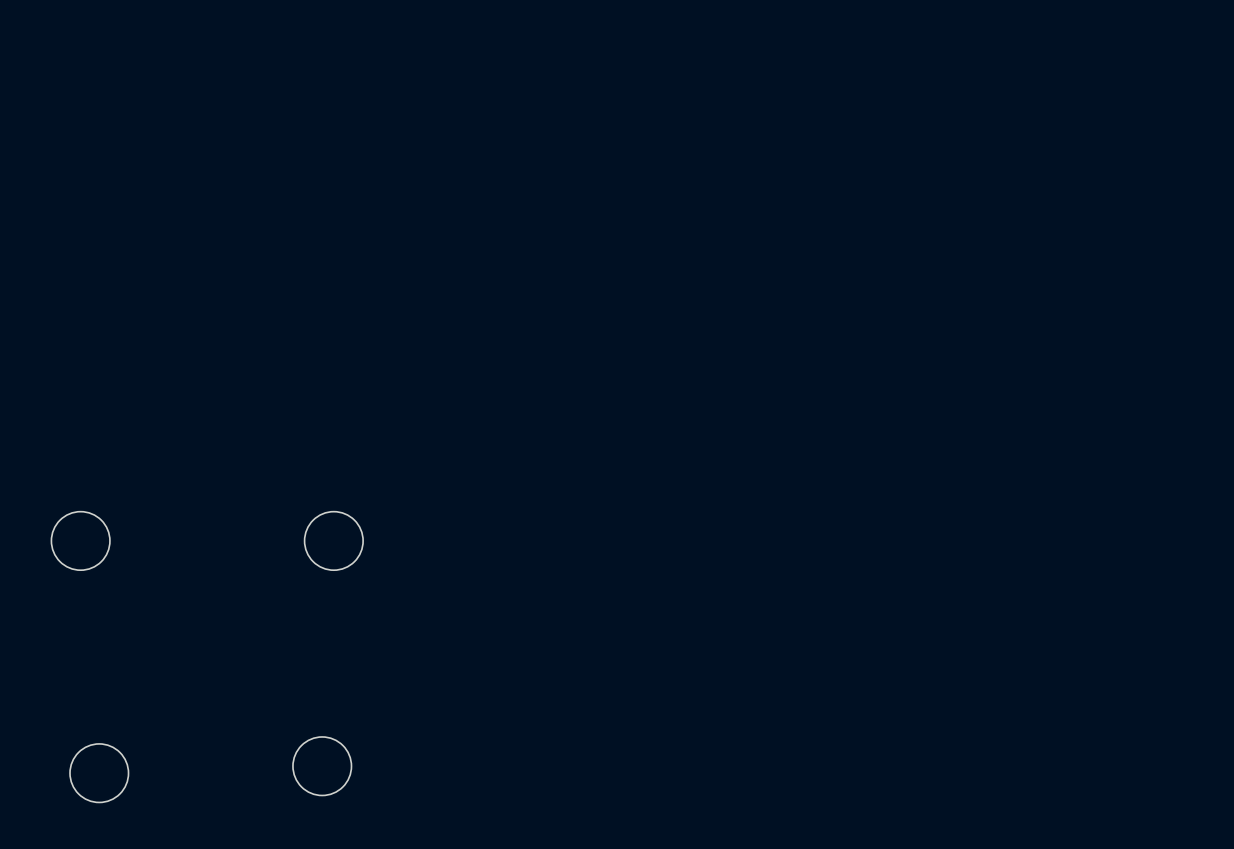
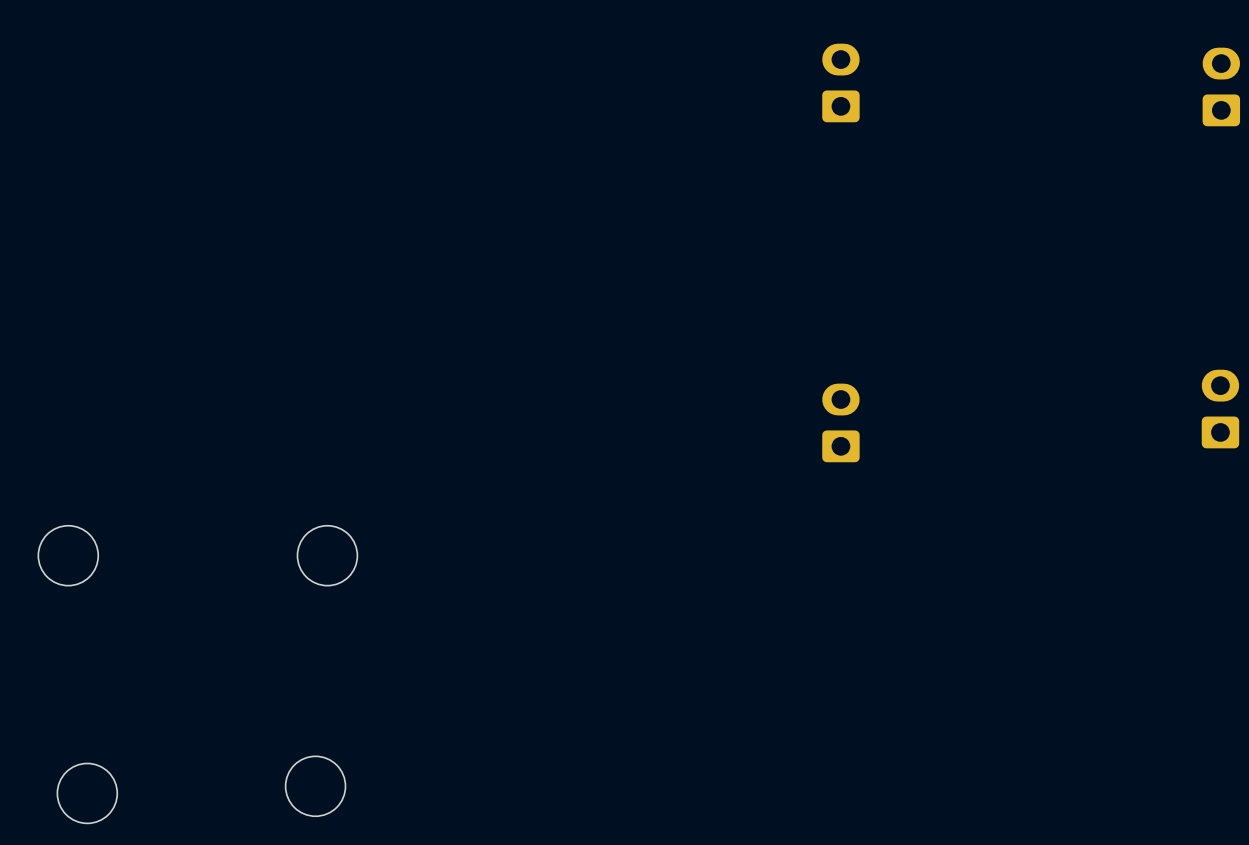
part: none -> (840, 82)
part: none -> (1221, 86)
part: none -> (1220, 409)
part: none -> (840, 422)

